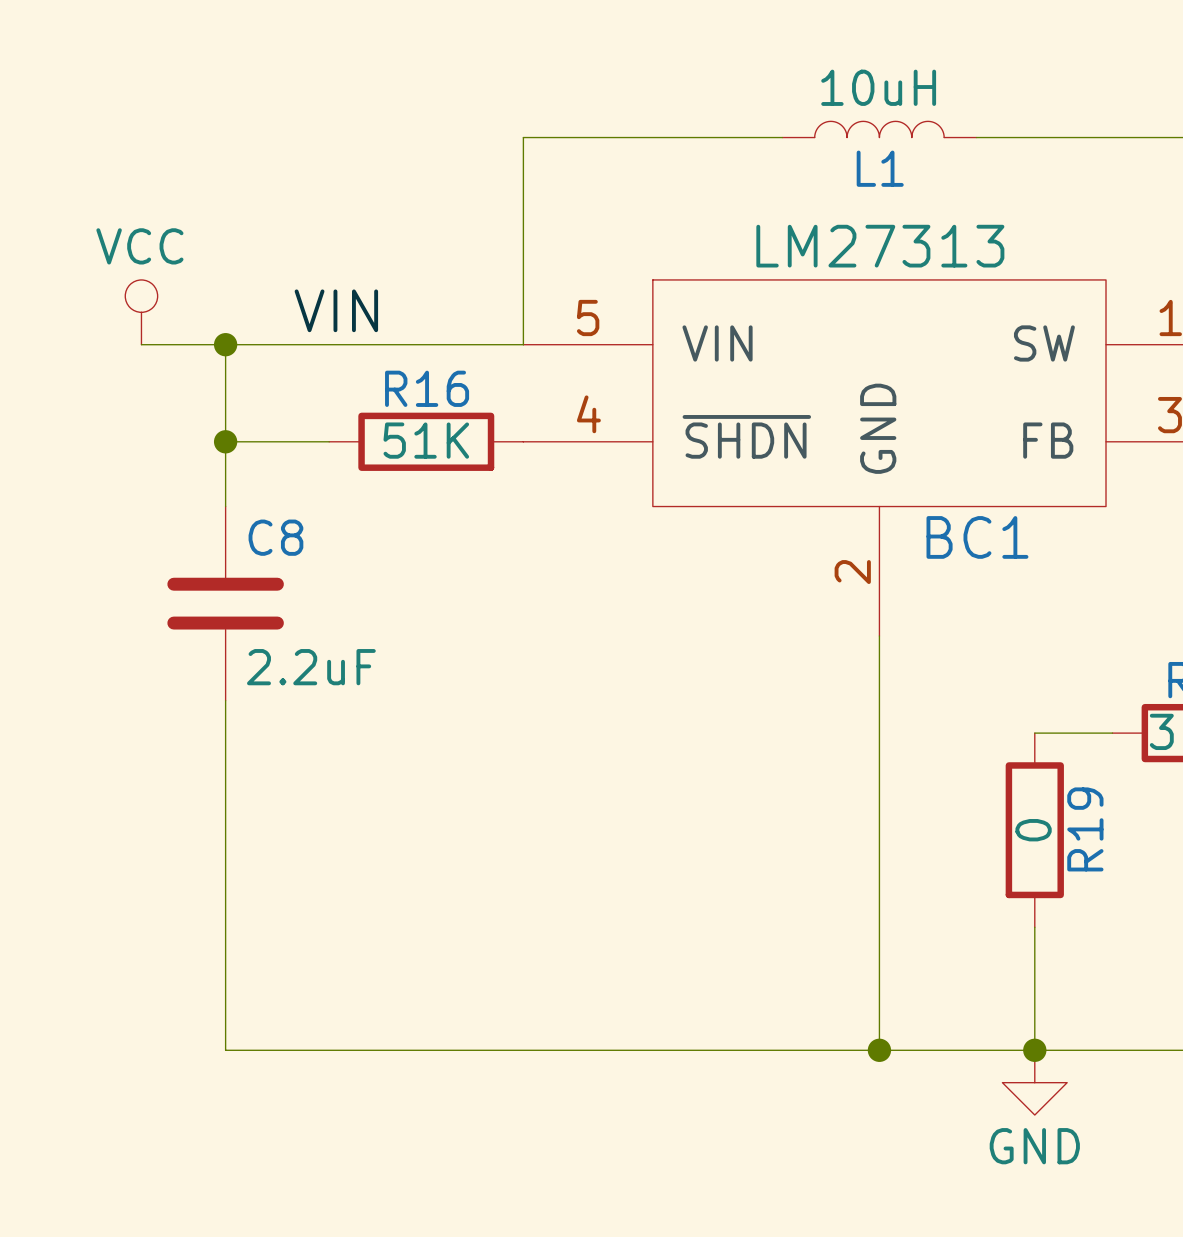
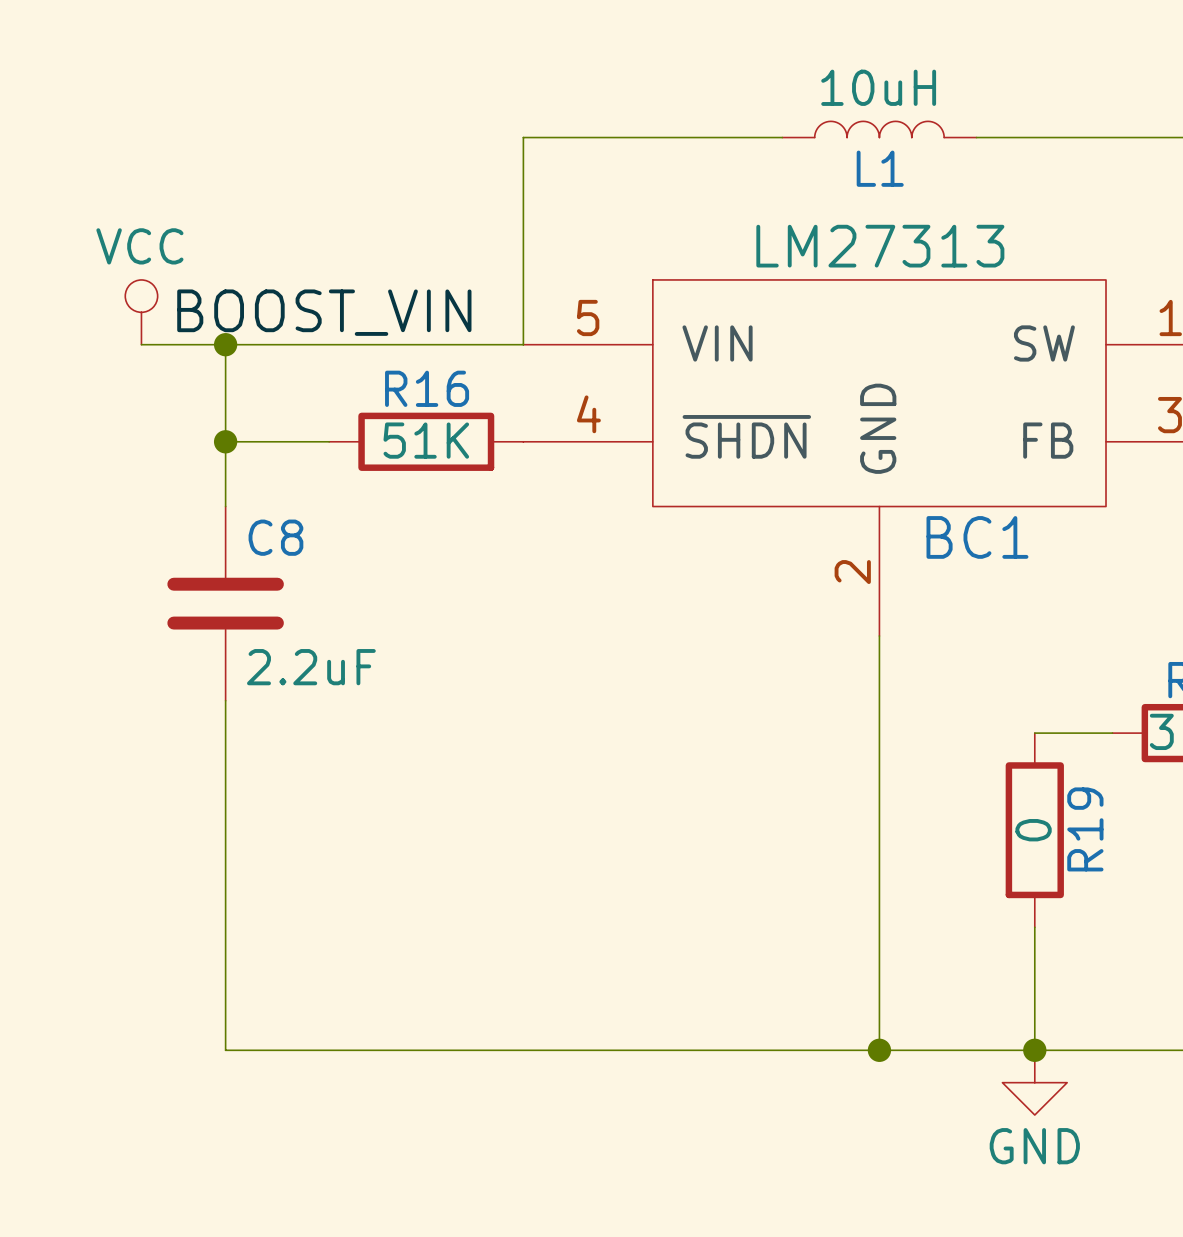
label: VIN (336, 310) -> none
label: none -> BOOST_VIN (324, 312)

